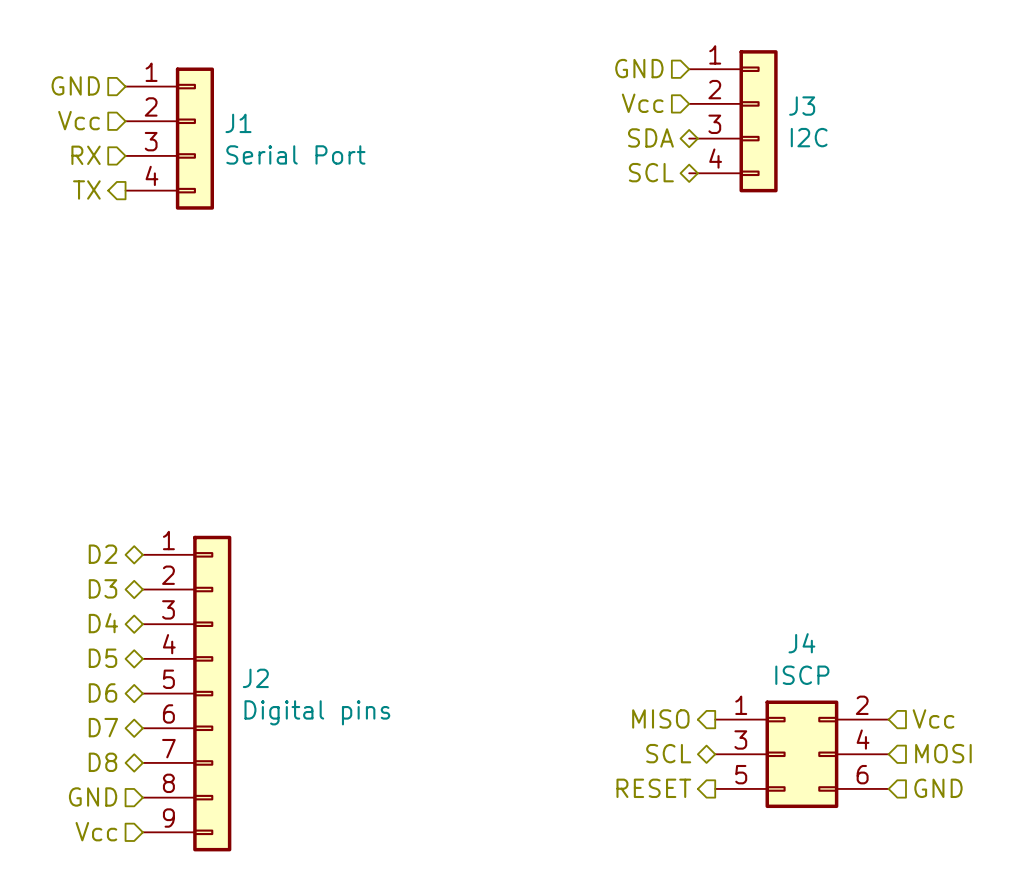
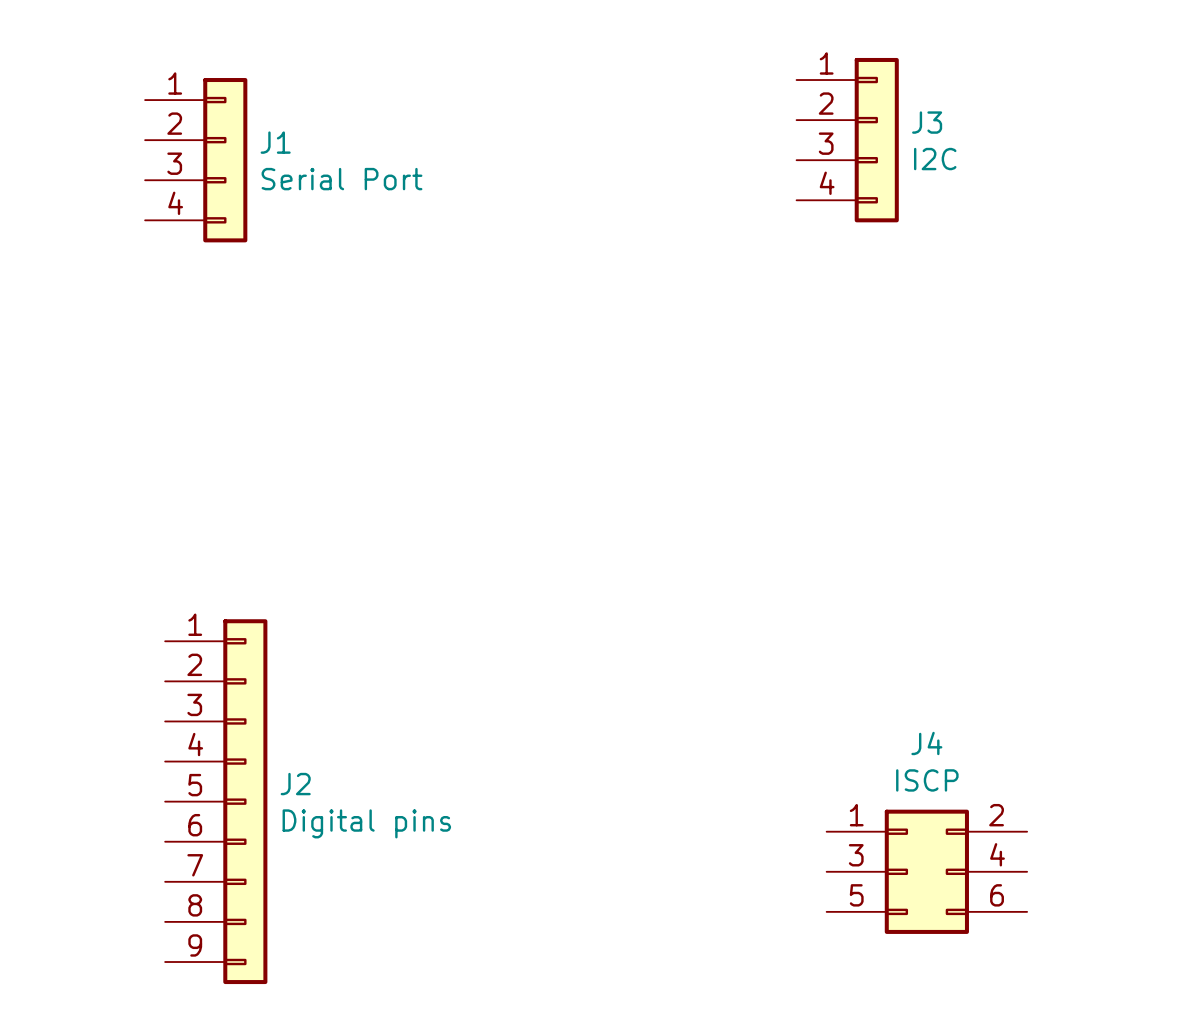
hierarchical label: GND (639, 68) -> none
hierarchical label: GND (75, 85) -> none
hierarchical label: Vcc (642, 103) -> none
hierarchical label: Vcc (79, 120) -> none
hierarchical label: SDA (650, 137) -> none
hierarchical label: RX (86, 155) -> none
hierarchical label: SCL (651, 172) -> none
hierarchical label: TX (86, 189) -> none
hierarchical label: D2 (102, 554) -> none
hierarchical label: D3 (102, 588) -> none
hierarchical label: D4 (103, 623) -> none
hierarchical label: D5 (102, 658) -> none
hierarchical label: D6 (102, 692) -> none
hierarchical label: MISO (660, 718) -> none
hierarchical label: Vcc (933, 718) -> none
hierarchical label: D7 (103, 727) -> none
hierarchical label: SCL (668, 753) -> none
hierarchical label: MOSI (943, 753) -> none
hierarchical label: D8 (102, 762) -> none
hierarchical label: RESET (653, 788) -> none
hierarchical label: GND (938, 788) -> none
hierarchical label: GND (93, 796) -> none
hierarchical label: Vcc (96, 831) -> none

